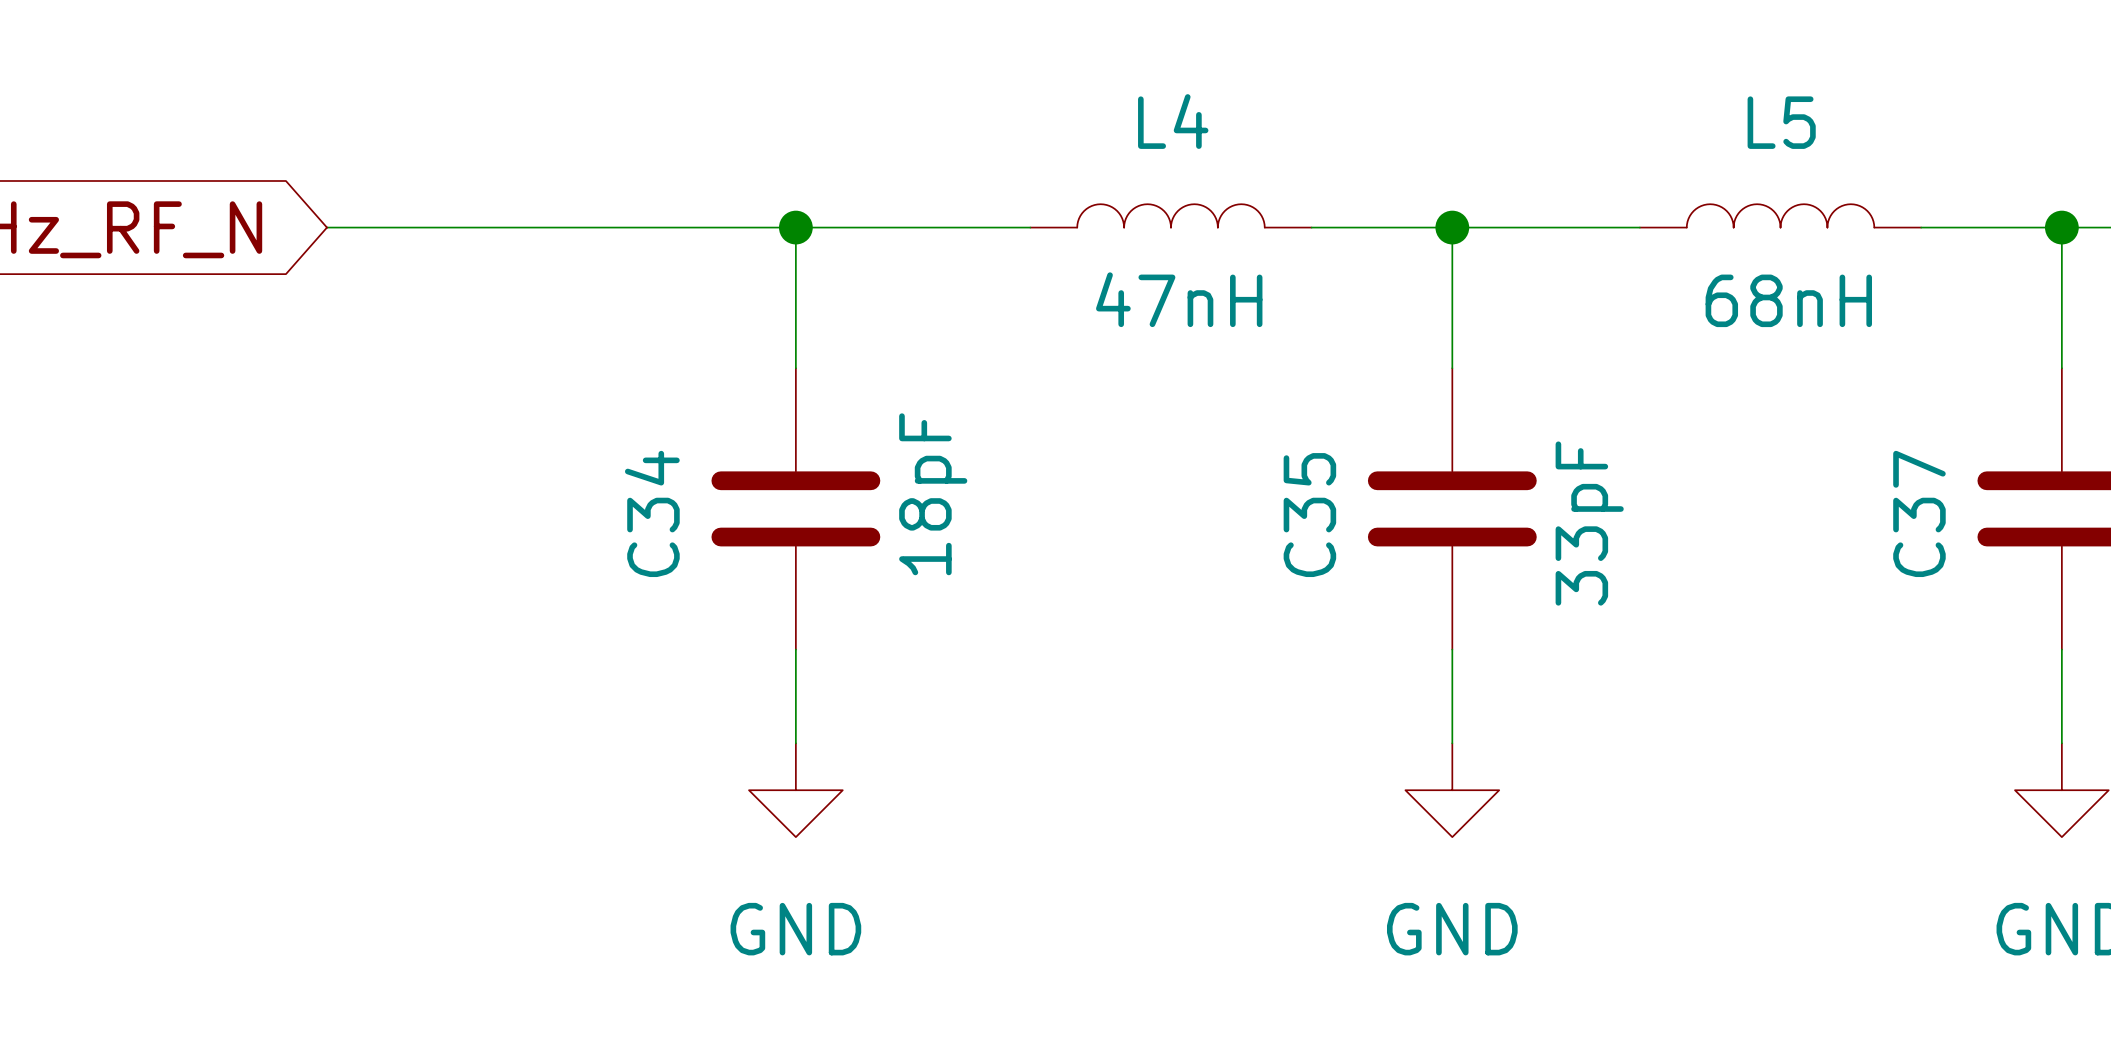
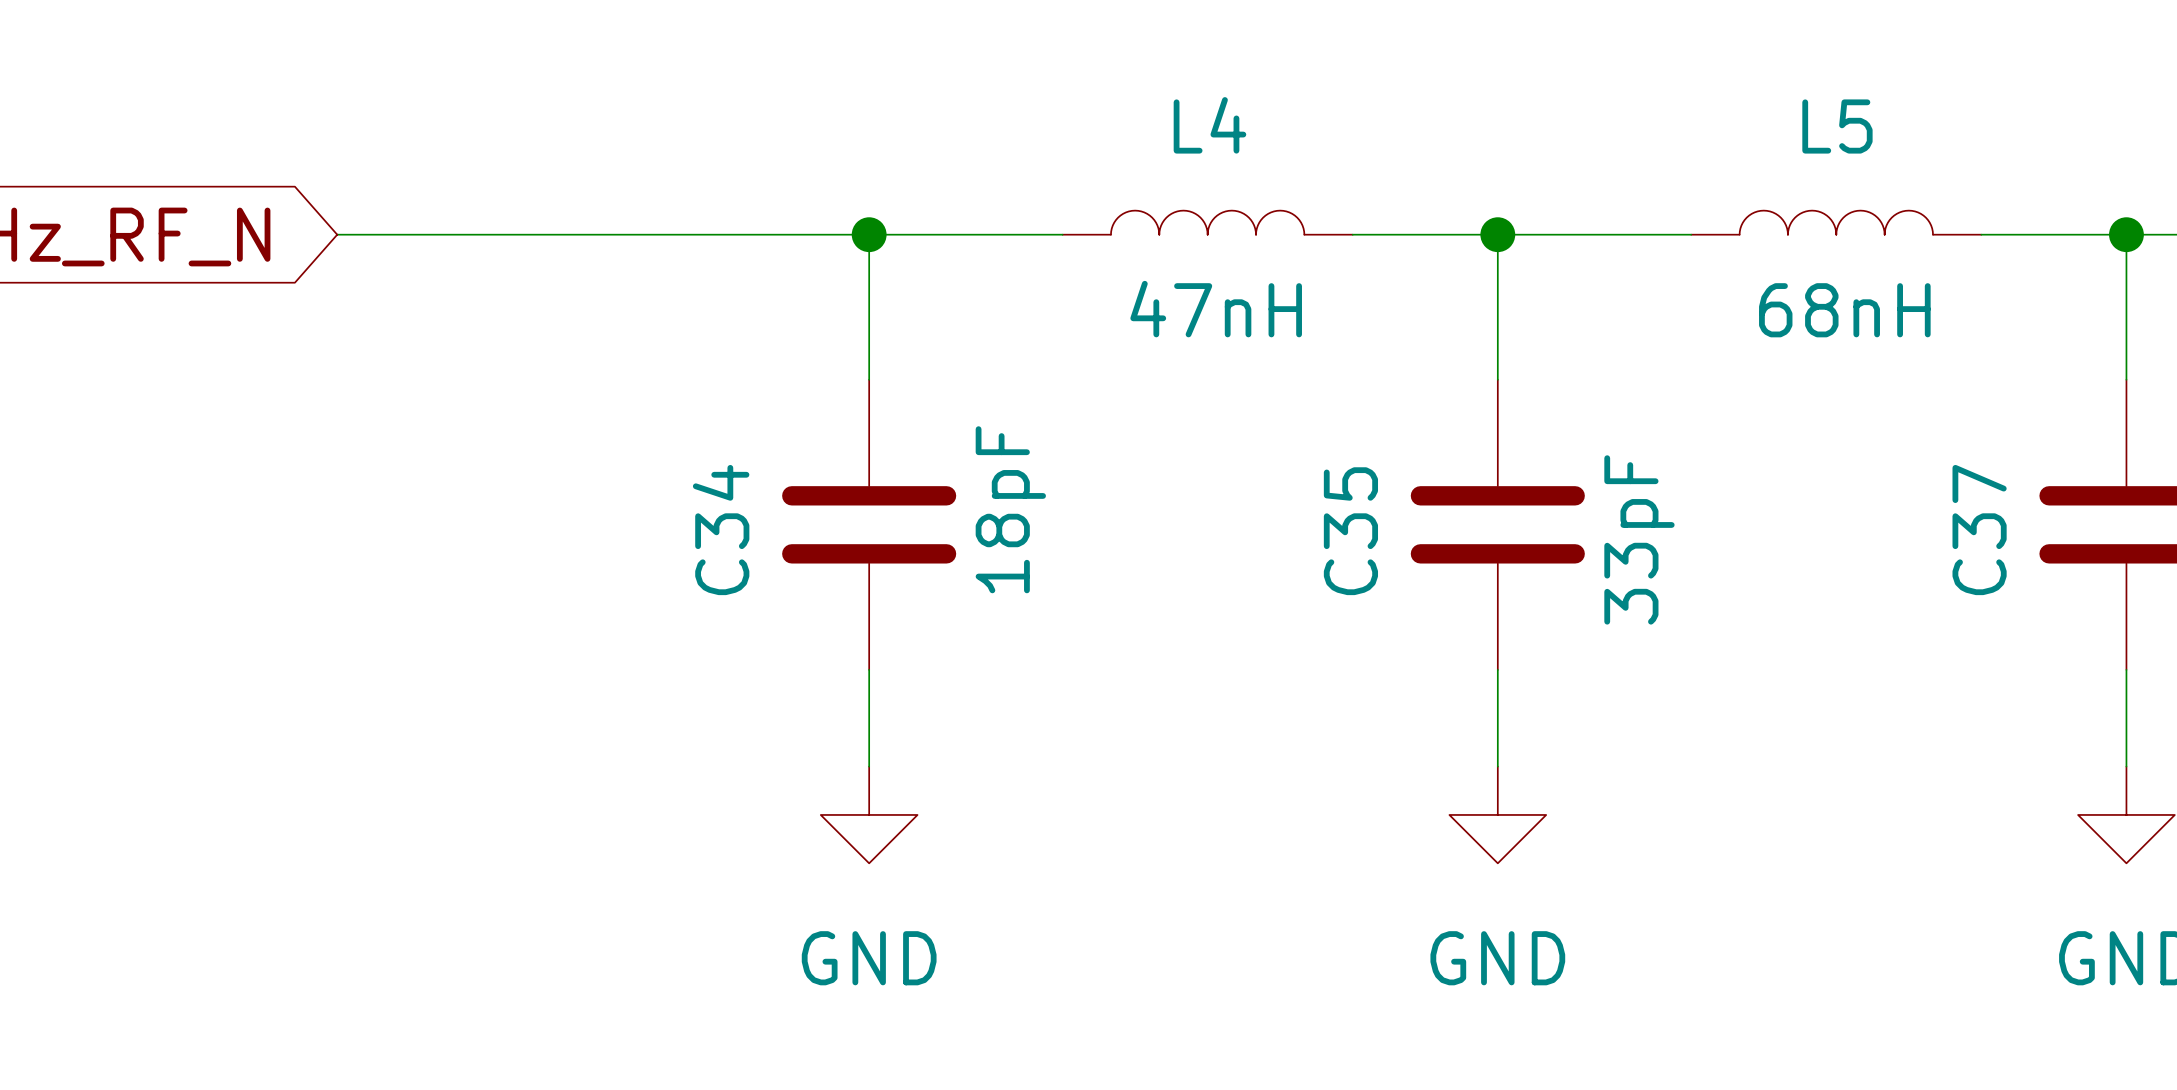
wire: (795, 227) (795, 368) -> (869, 234) (869, 379)
junction position: (795, 227) -> (869, 234)
C34 position: (795, 508) -> (869, 524)
wire: (795, 649) (795, 743) -> (869, 669) (869, 766)
power symbol position: GND (795, 790) -> GND (869, 814)

